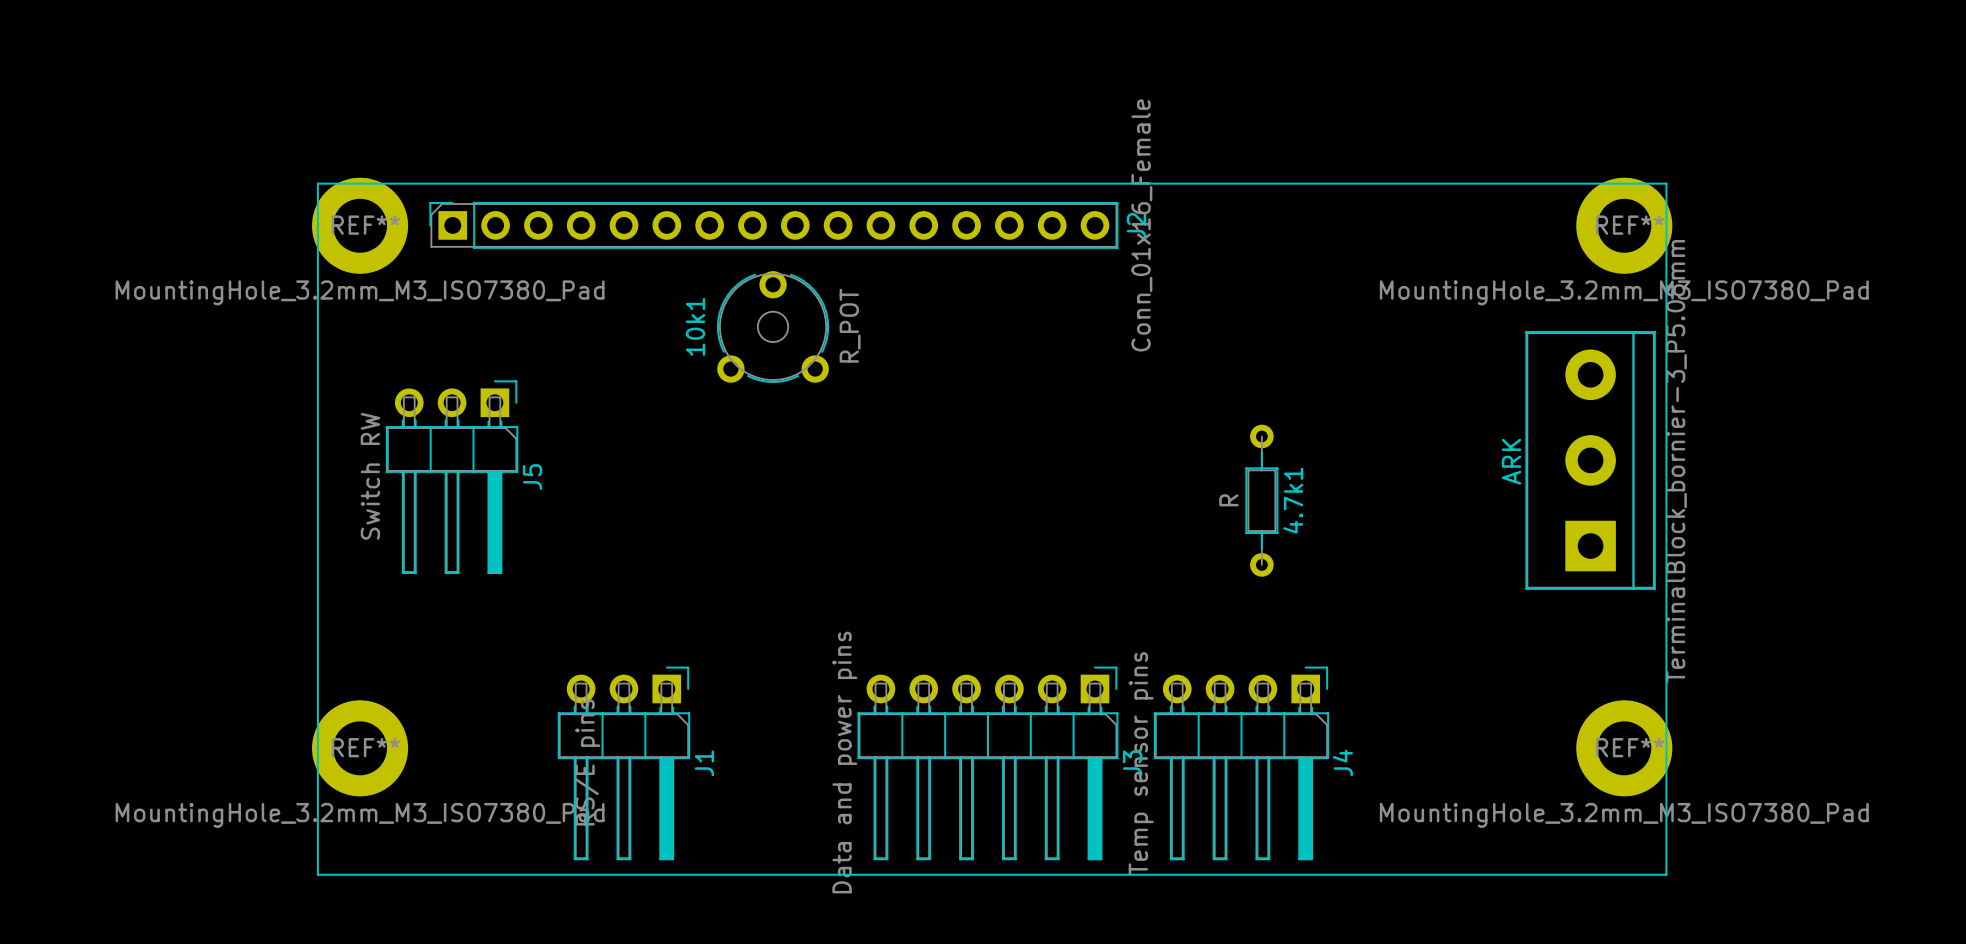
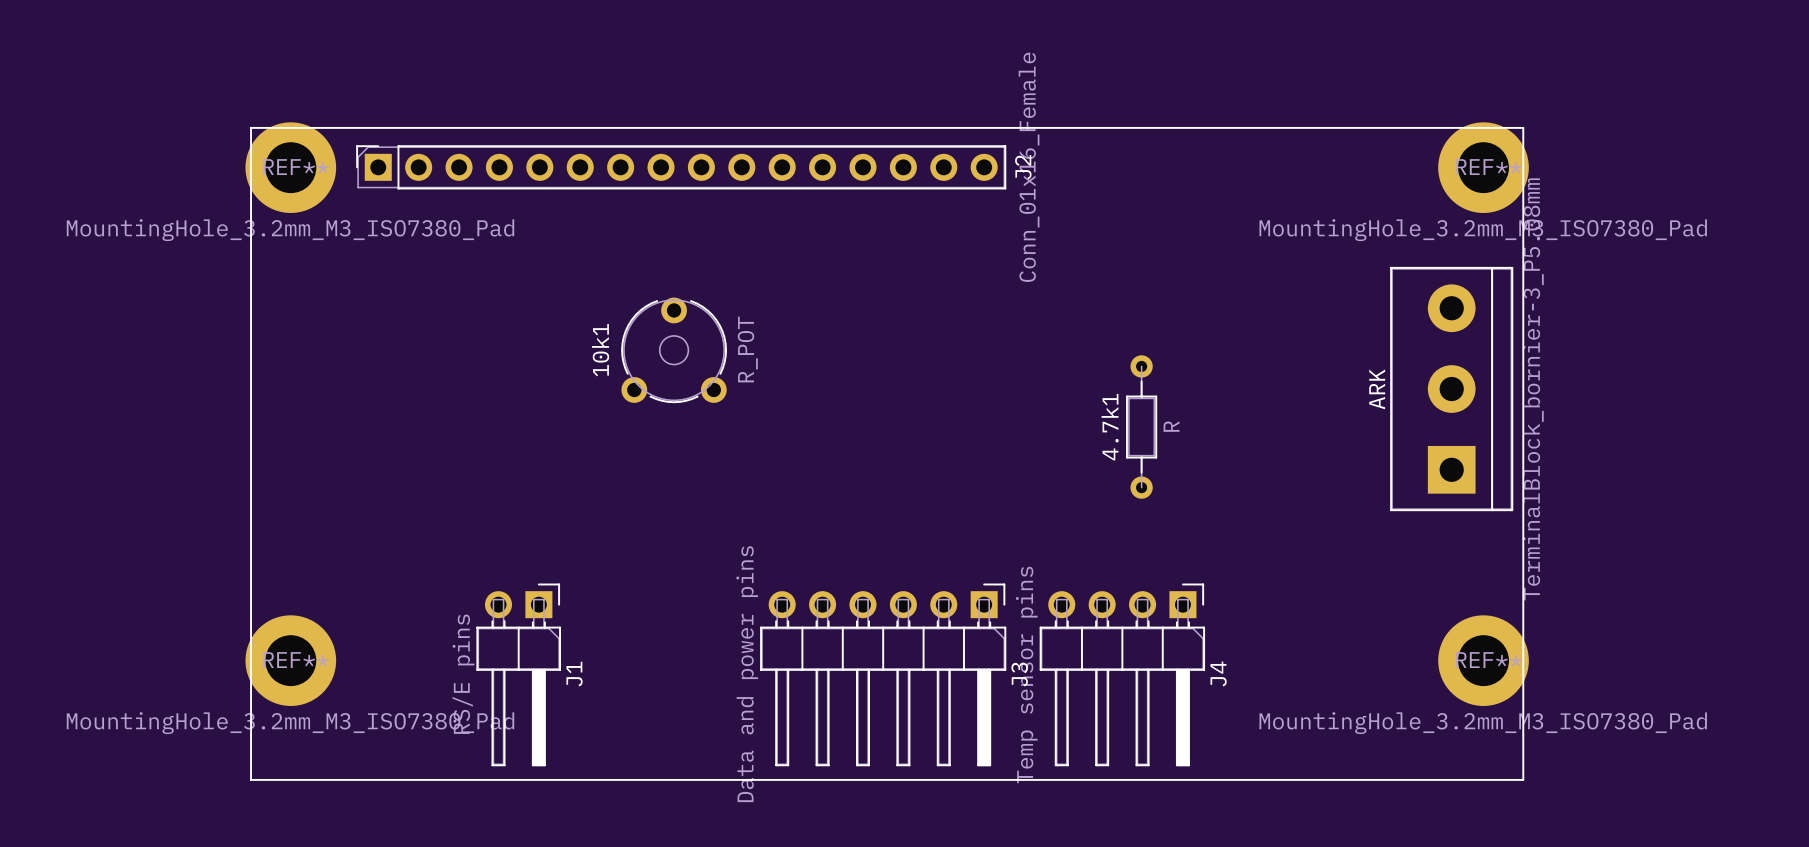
10k1 position: (773, 327) -> (674, 350)
J5: Switch RW (452, 477) -> none
4.7k1 value position: R (1228, 500) -> R (1171, 426)
4.7k1 name position: 4.7k1 (1293, 500) -> 4.7k1 (1110, 427)
J1 footprint: [557, 666, 691, 861] -> [476, 583, 561, 767]

